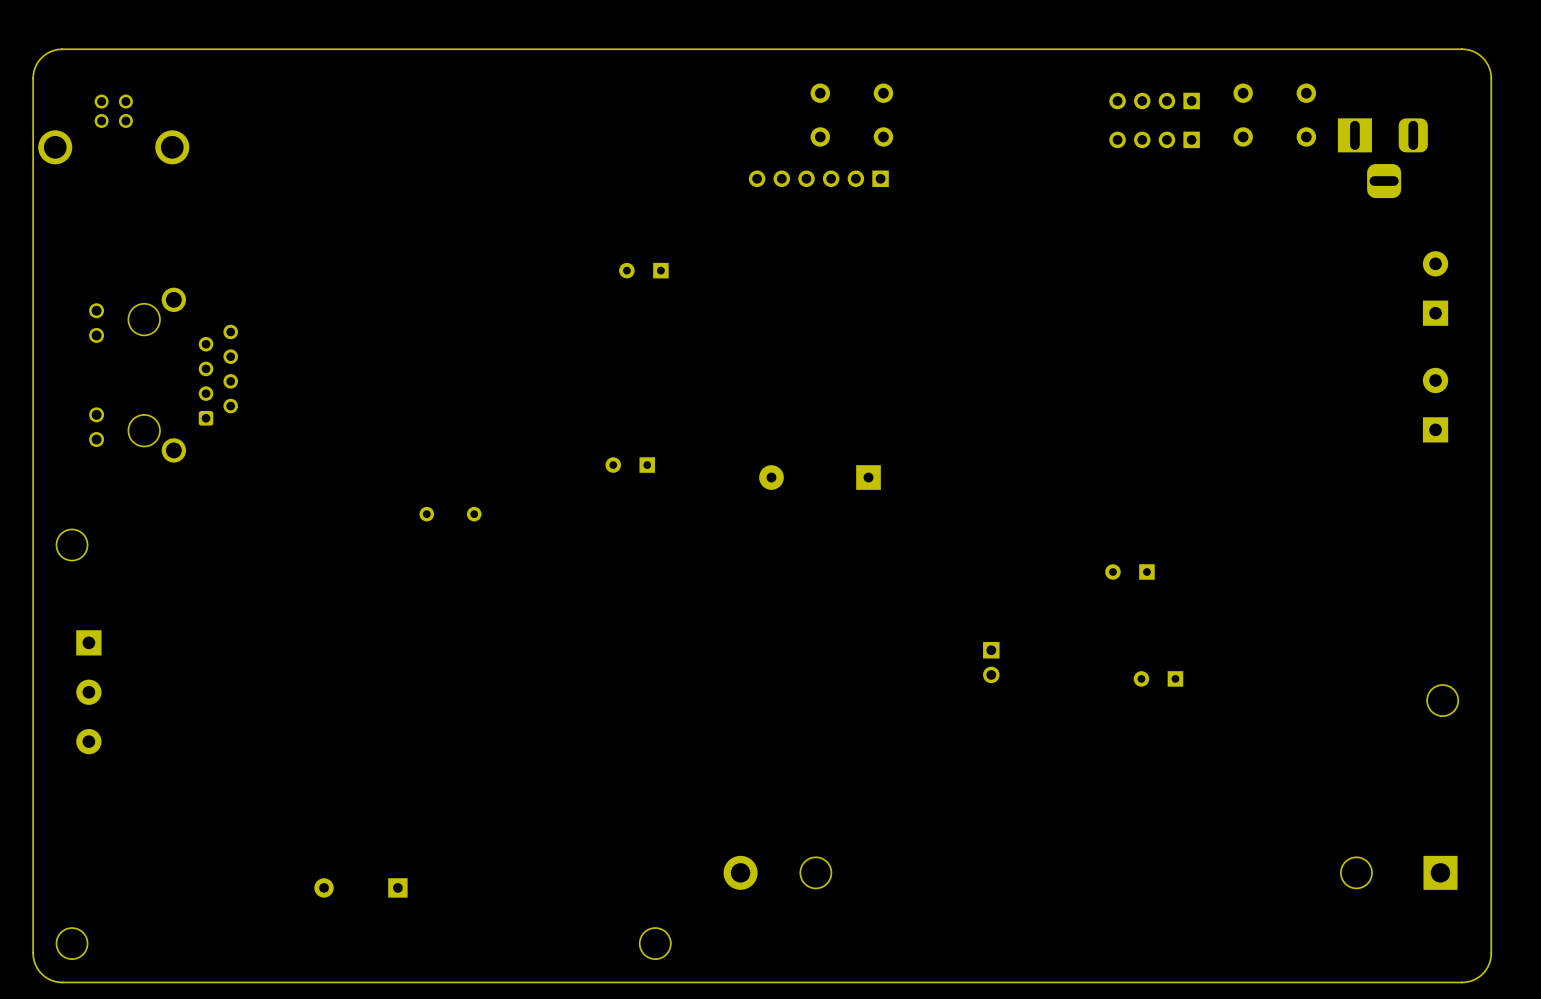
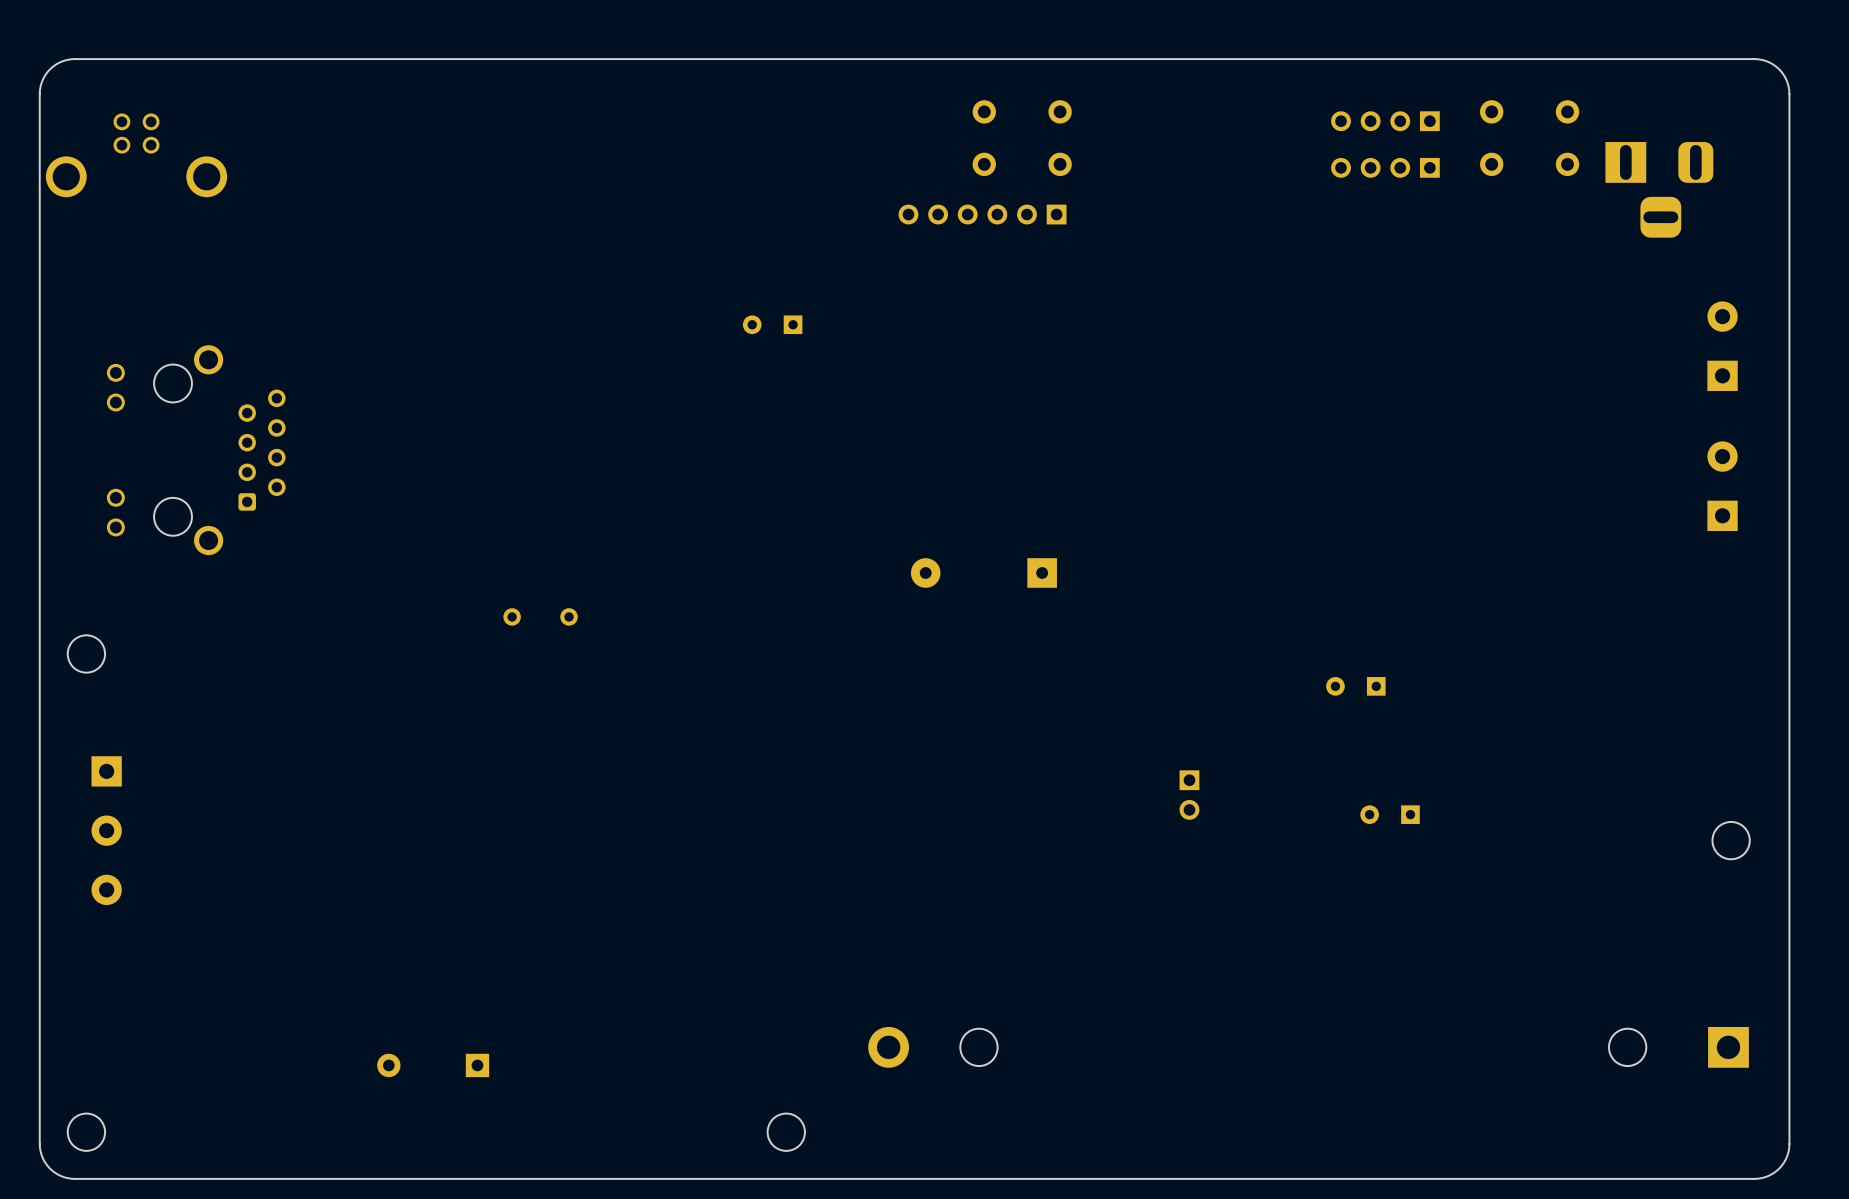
part: (630, 465) -> none

